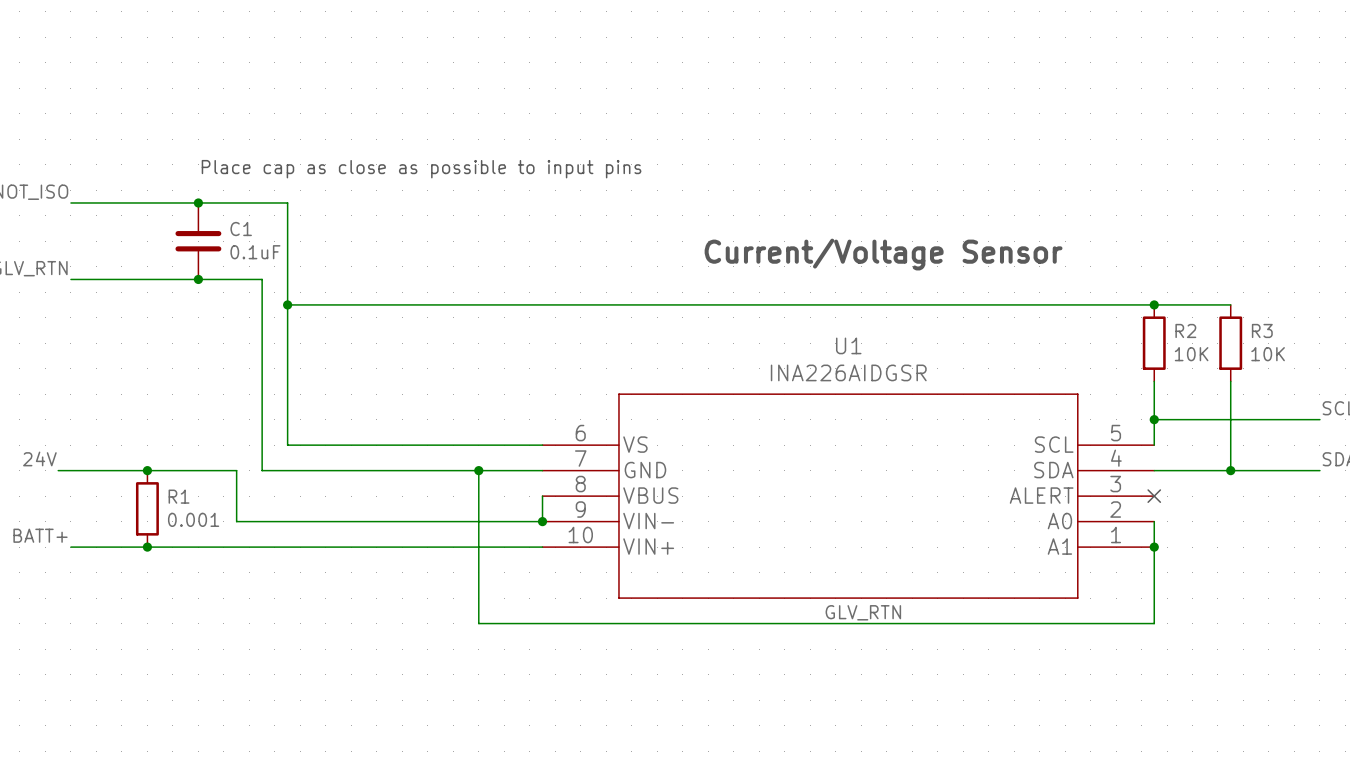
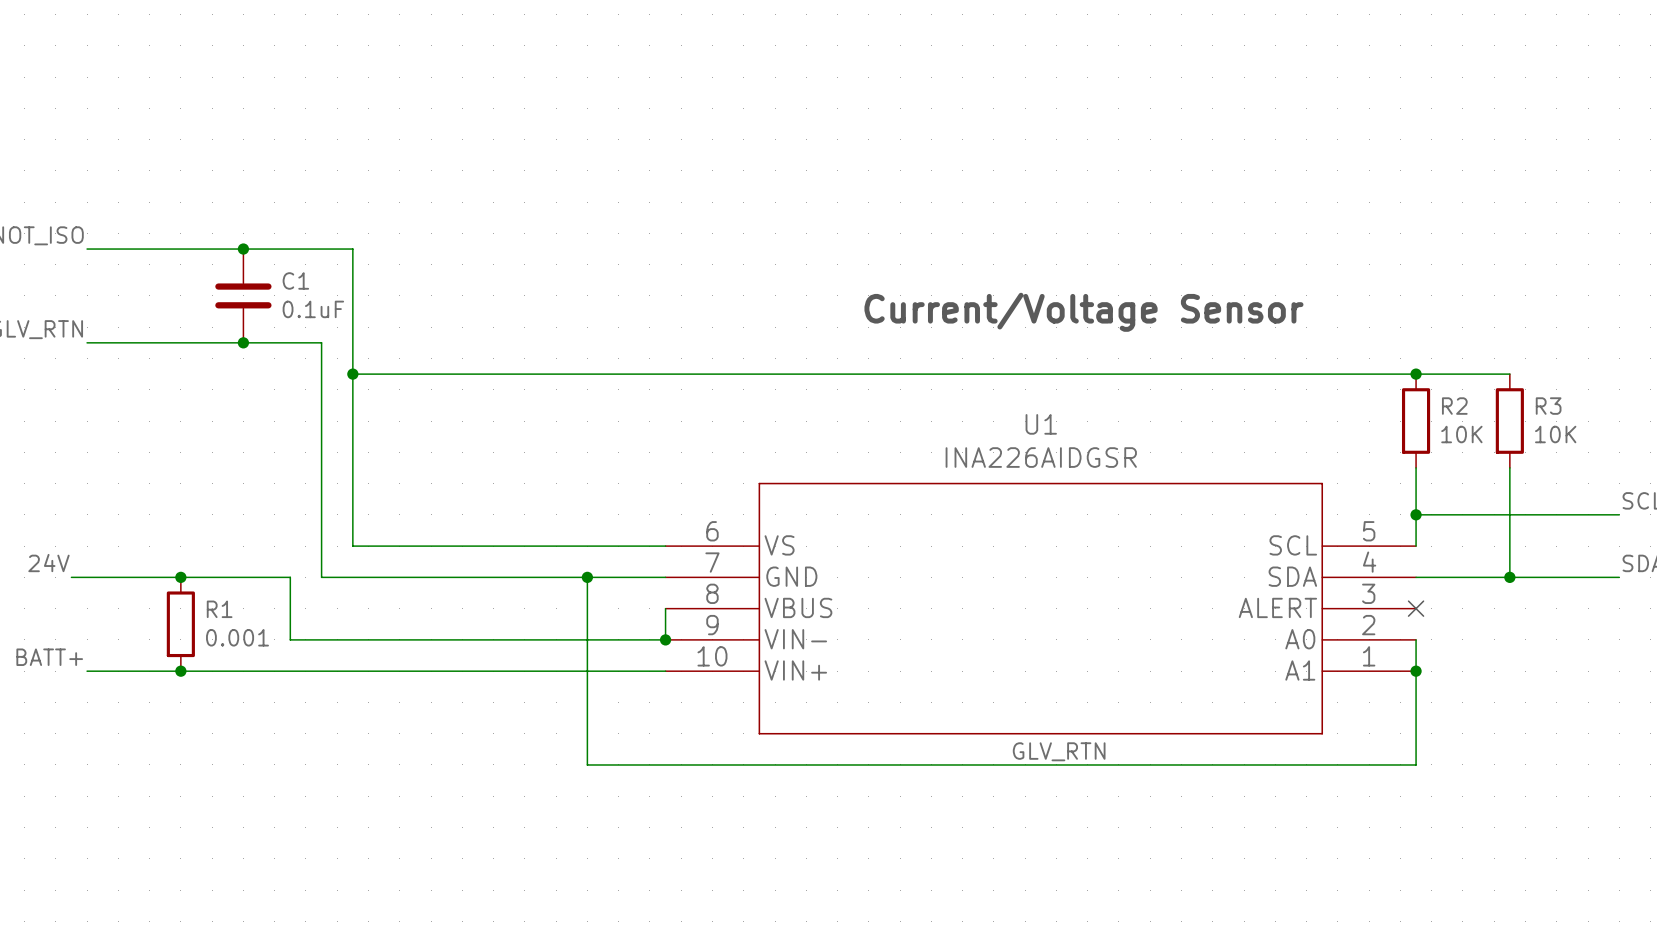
text: Place cap as close as possible to input pins (421, 169) -> none

